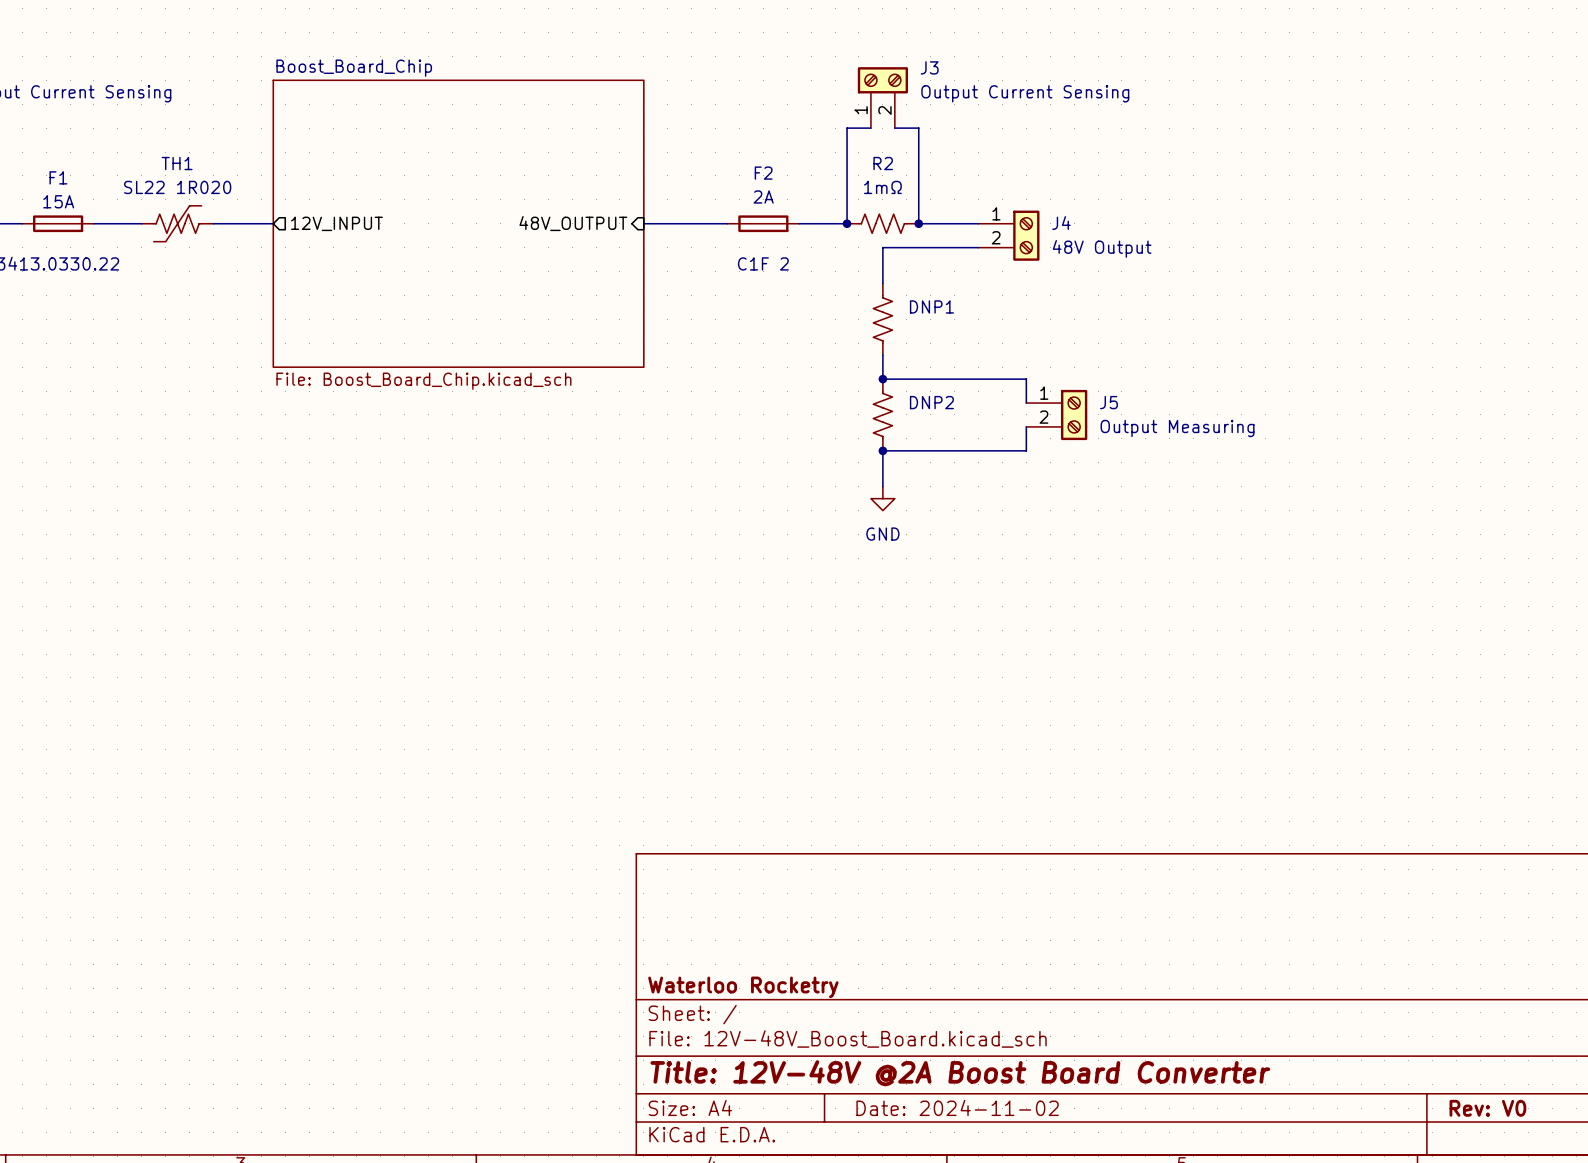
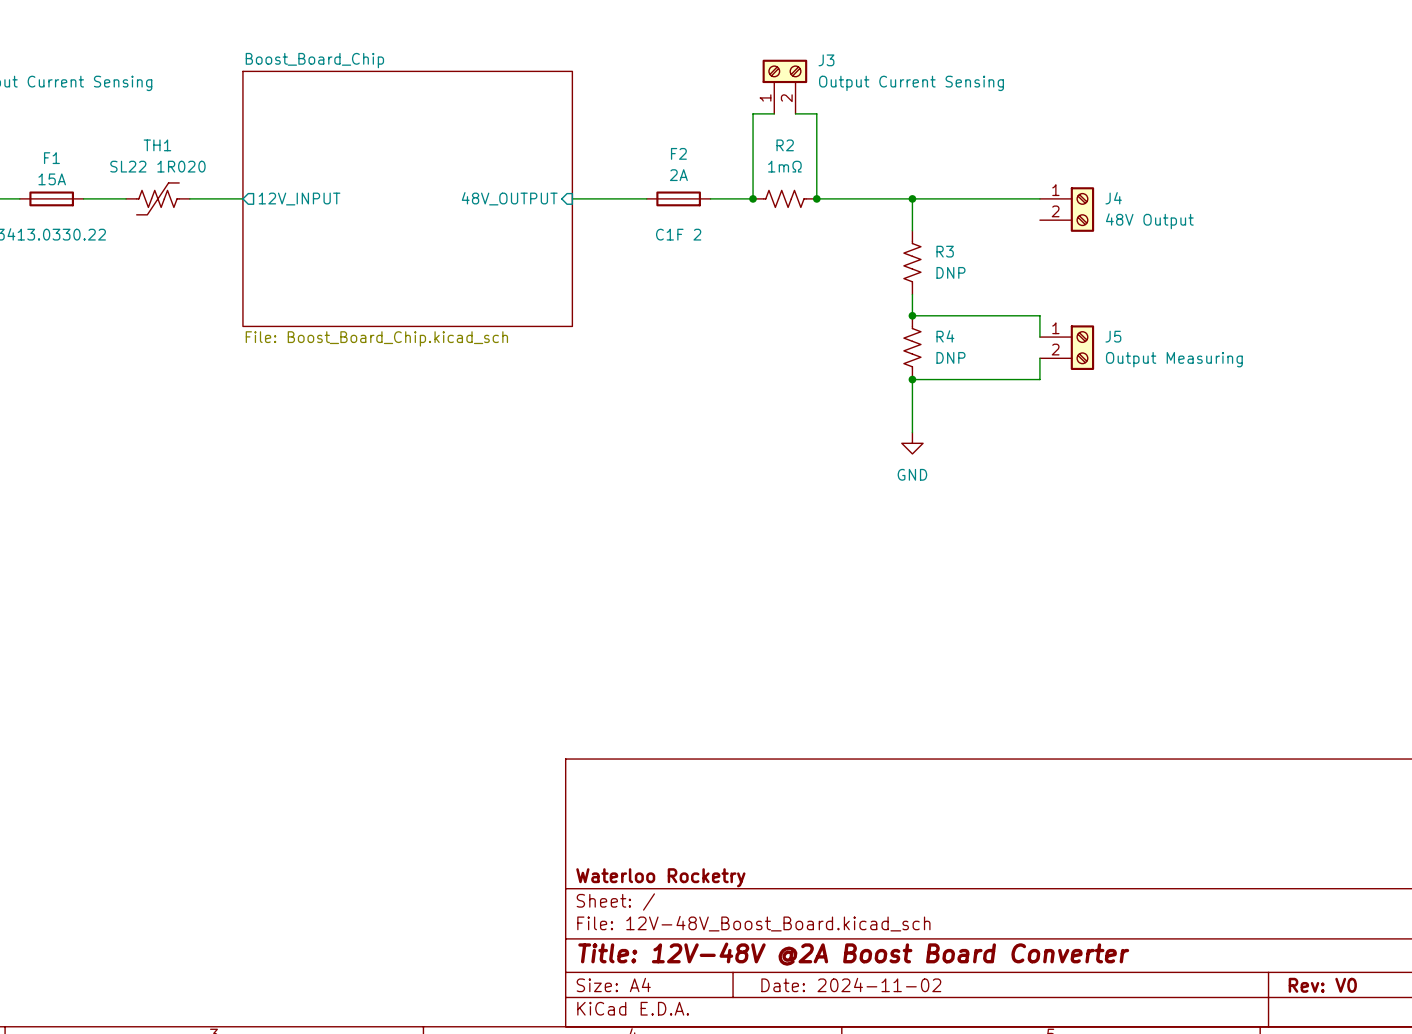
wire: none -> (869, 198) (1039, 198)
junction: none -> (912, 198)
J4 position: (1009, 235) -> (1067, 209)
wire: (978, 247) (882, 247) (882, 283) -> none
R3: none -> DNP (912, 262)
DNP1: (882, 319) -> none
wire: (882, 355) (882, 379) (1026, 379) (1026, 403) -> (912, 294) (912, 315) (1039, 315) (1039, 337)
junction: none -> (912, 315)
junction: (882, 379) -> none
R4: none -> DNP (912, 347)
wire: none -> (1039, 358) (1039, 379) (912, 379)
DNP2: (882, 414) -> none
J5 position: (1056, 414) -> (1067, 347)
junction: none -> (912, 379)
junction: (882, 450) -> none
wire: (1026, 450) (882, 450) (882, 486) -> (912, 400) (912, 432)
power symbol position: GND (882, 498) -> GND (912, 443)

